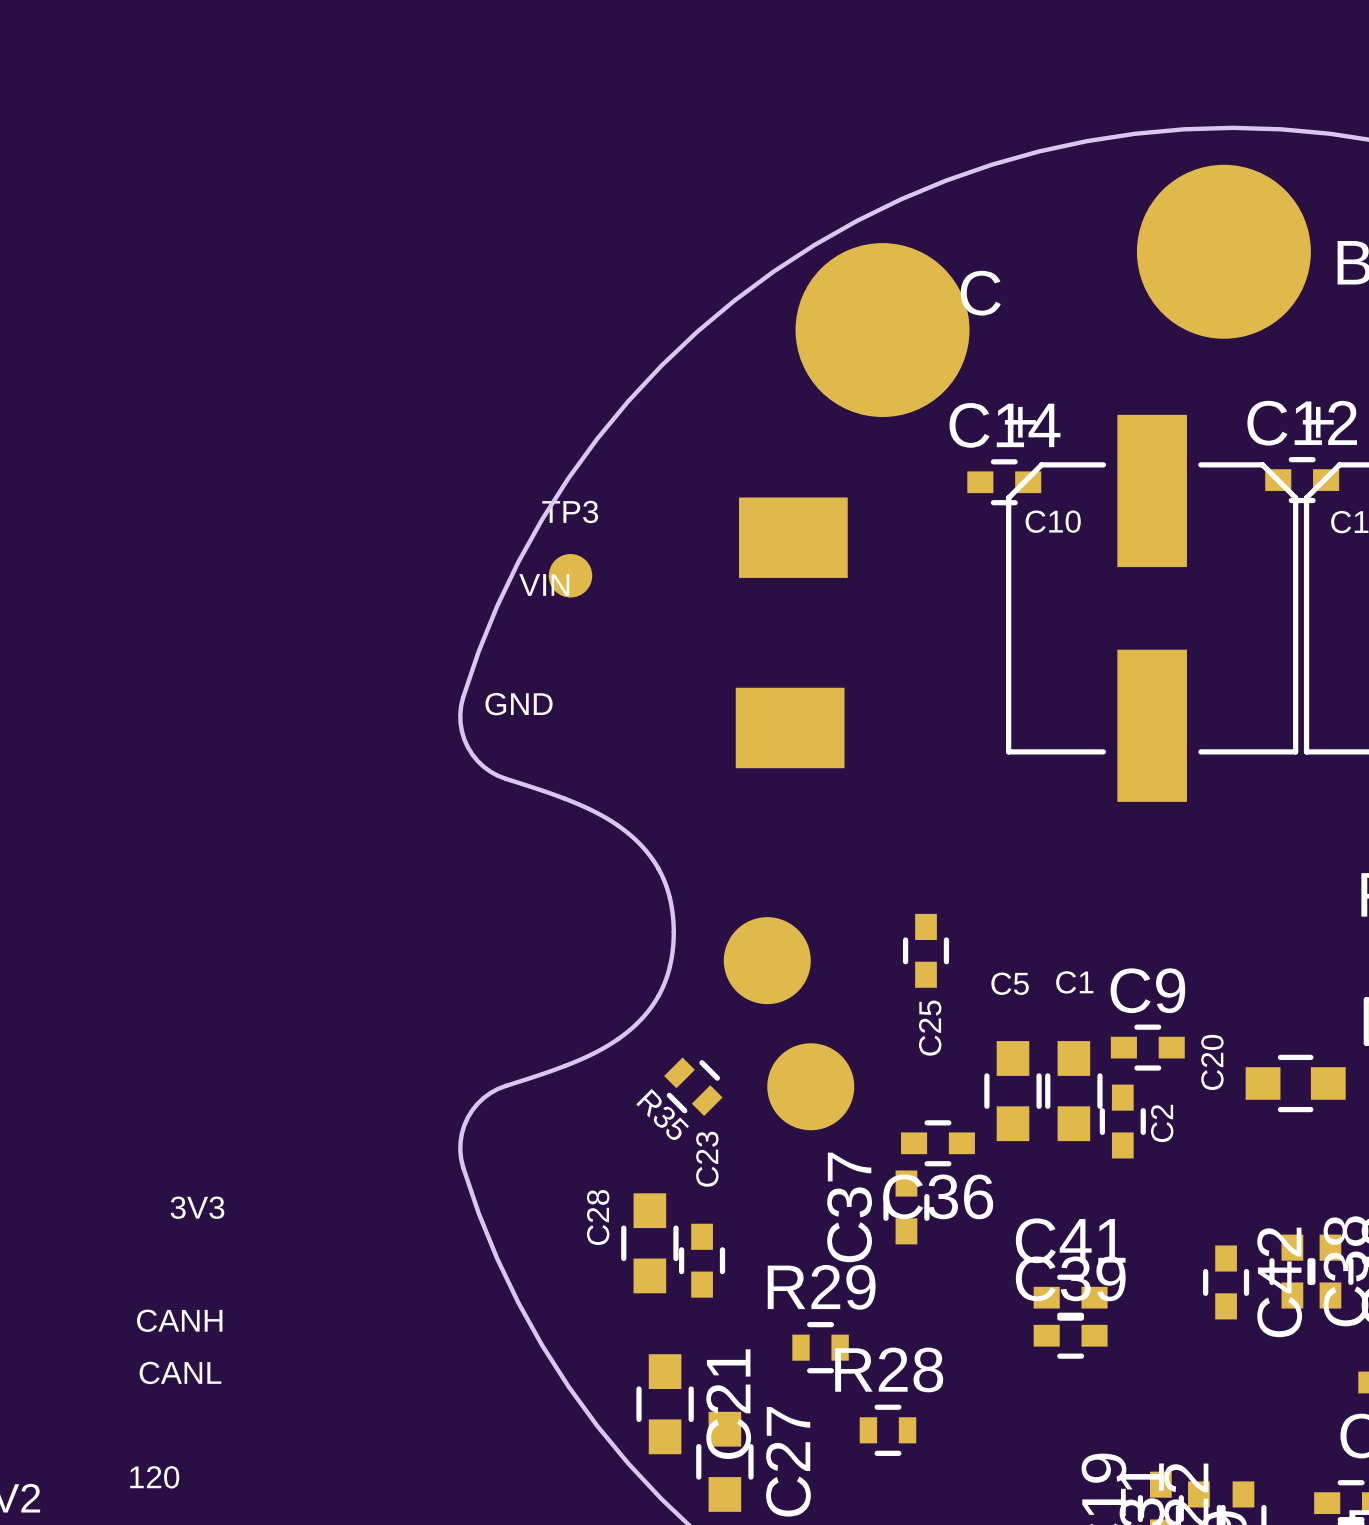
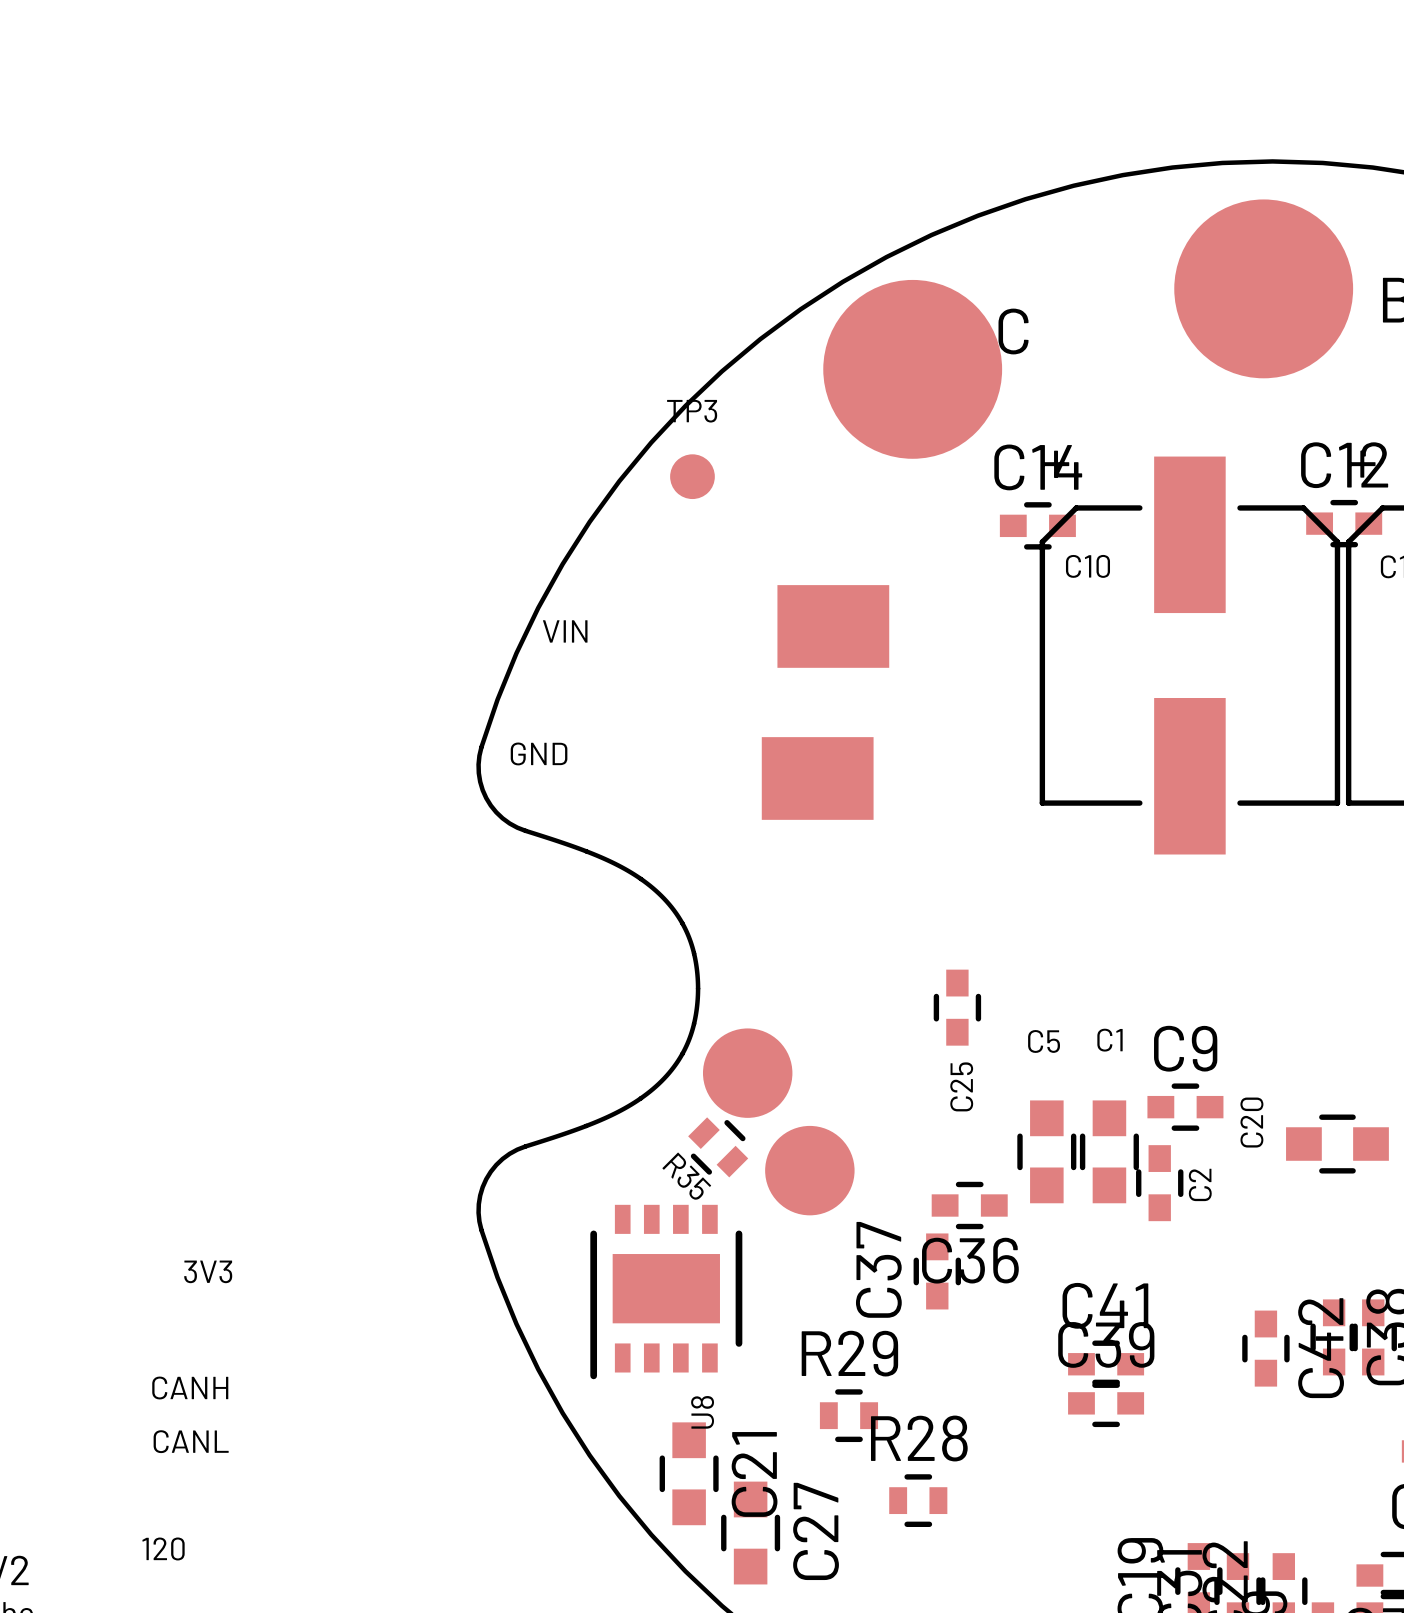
part position: (793, 537) -> (833, 626)
TP3 position: (570, 575) -> (692, 476)
part position: (767, 960) -> (747, 1073)
part position: (810, 1086) -> (809, 1170)
U8: none -> (666, 1292)
C28: (649, 1243) -> none
C23: (702, 1260) -> none

